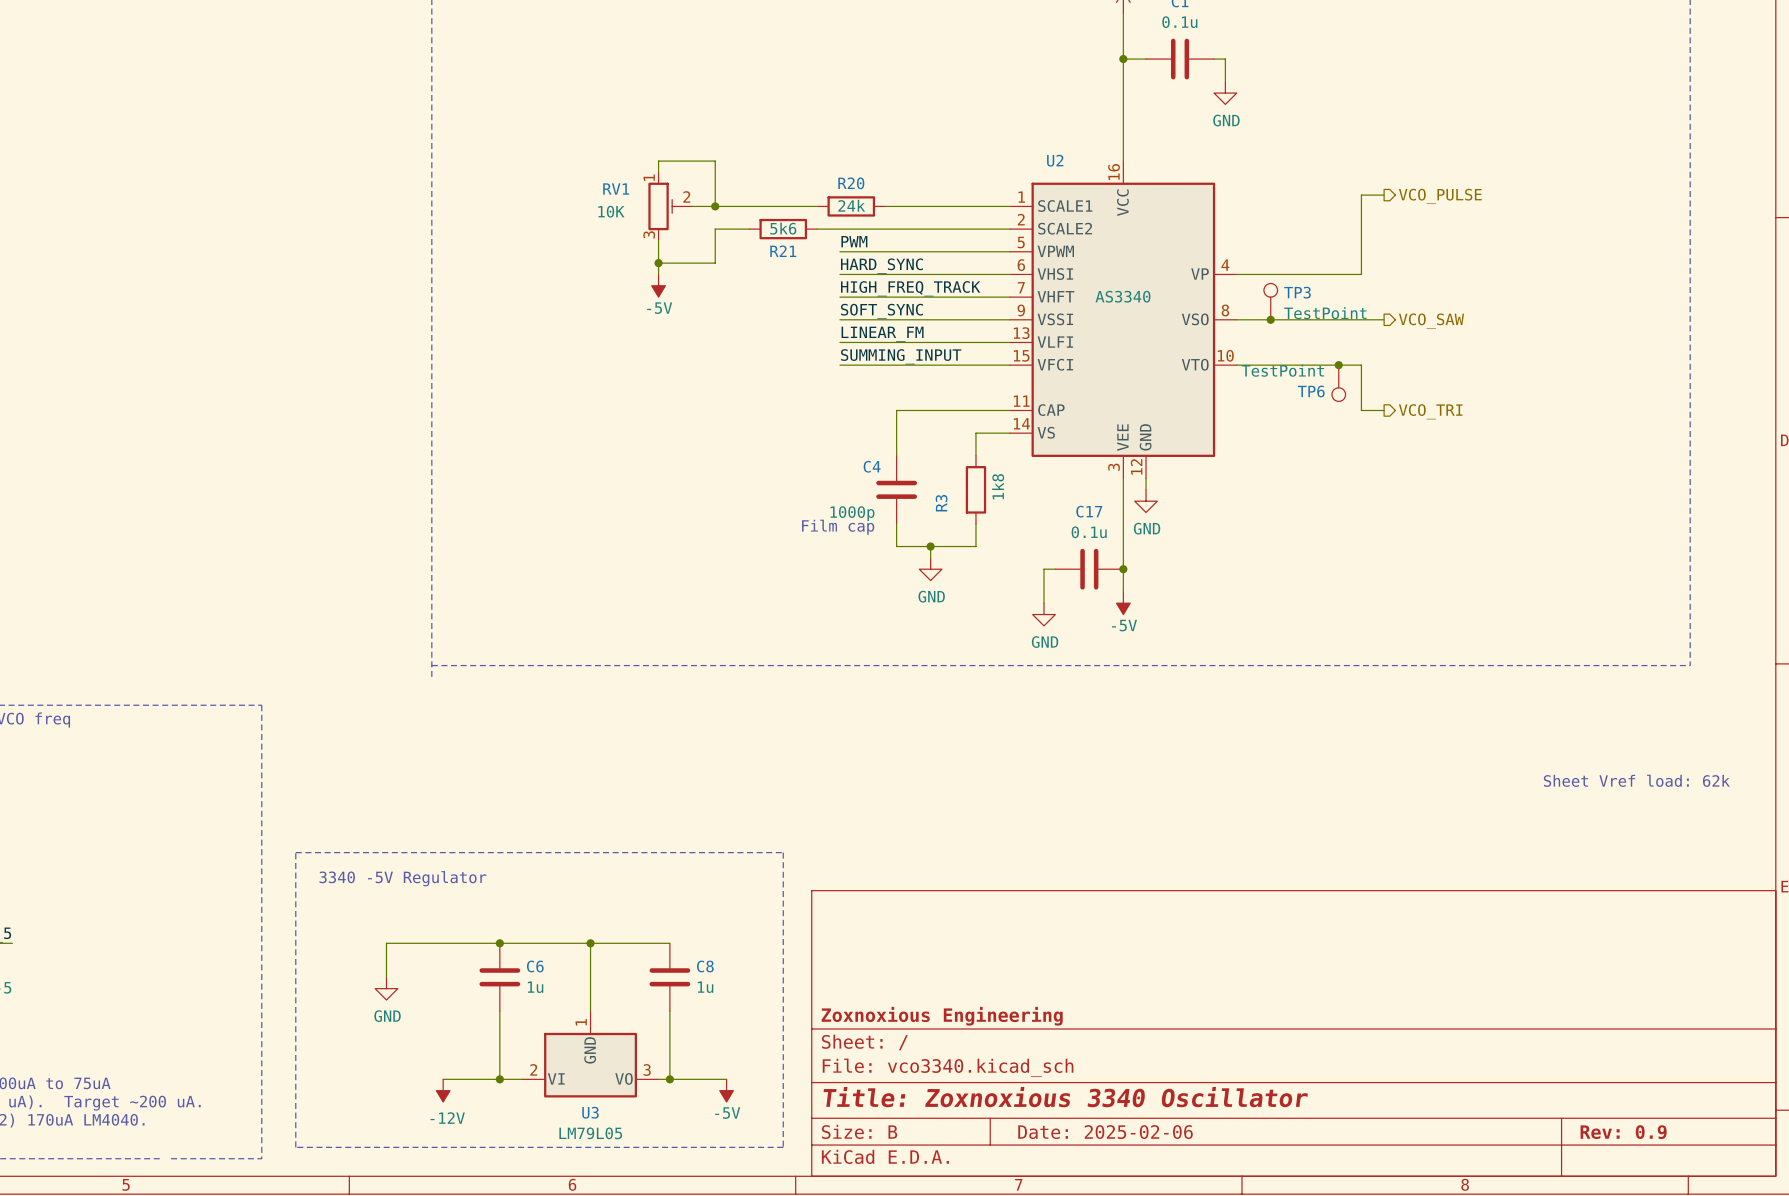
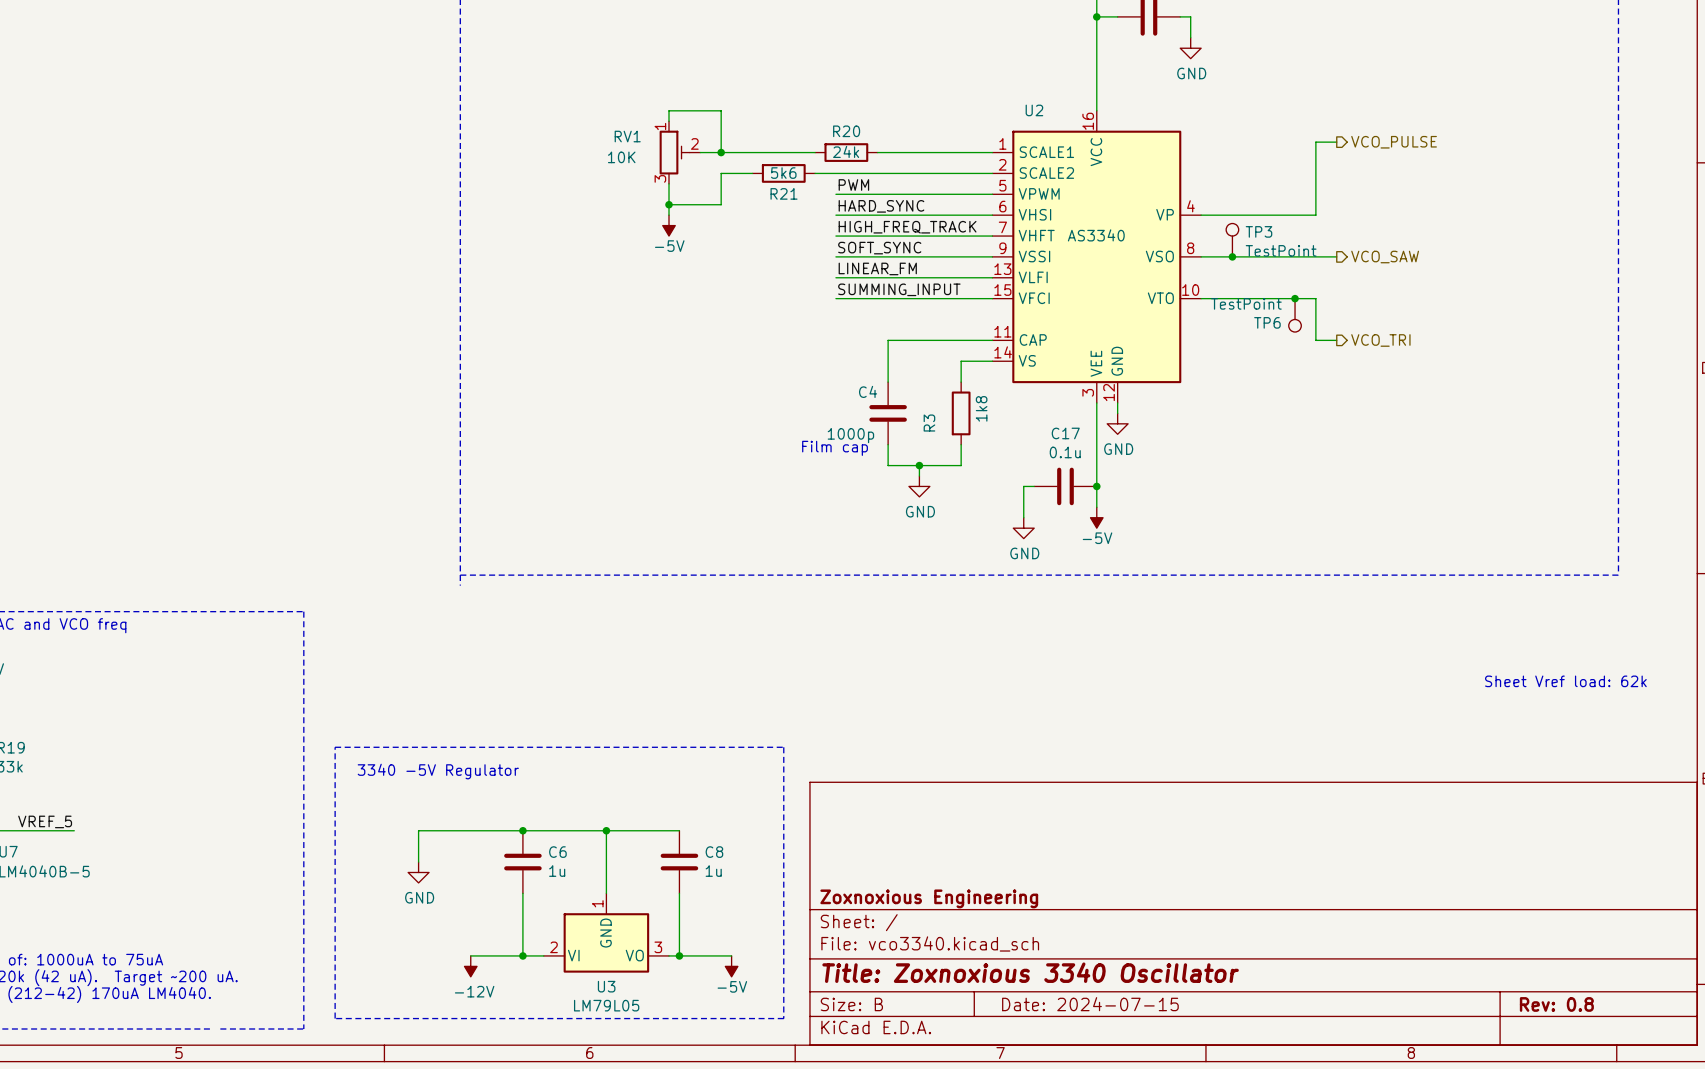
title block: Date: 2025-02-06 (1105, 1132) -> Date: 2024-07-15 (1090, 1004)
title block: Rev: 0.9 (1623, 1132) -> Rev: 0.8 (1556, 1004)

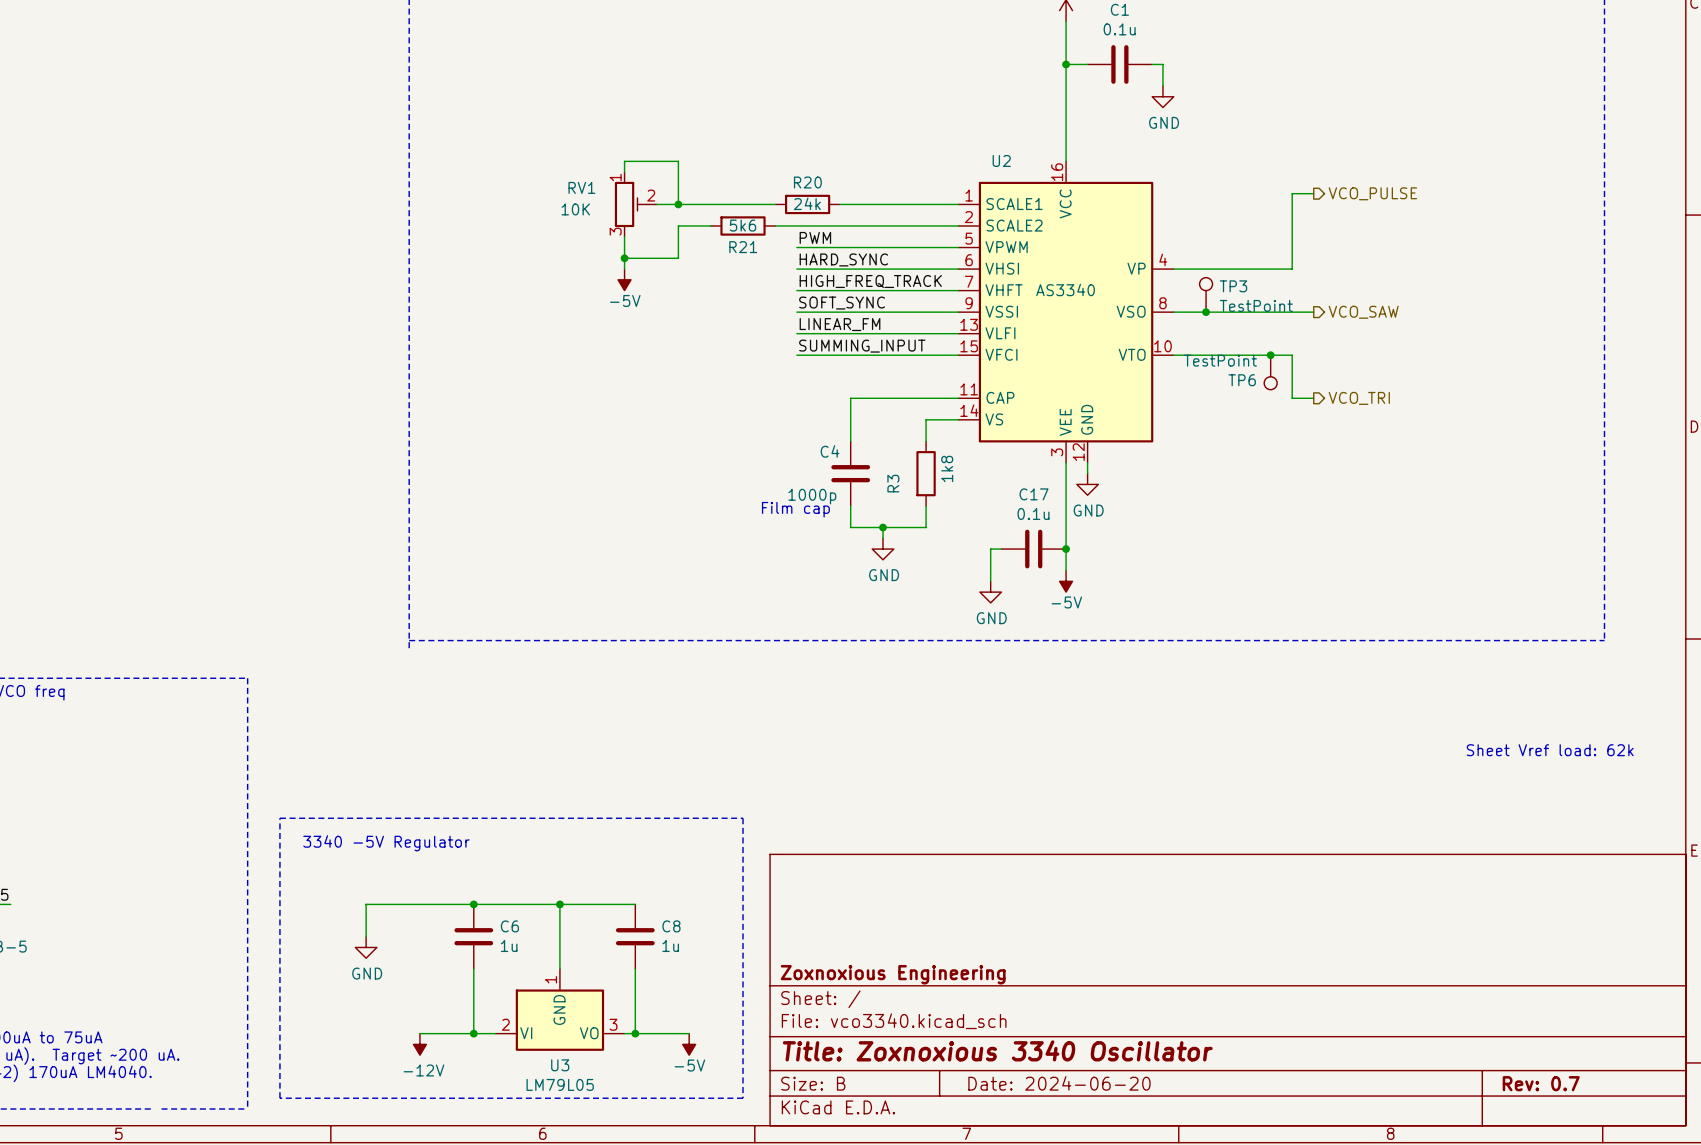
title block: Date: 2024-07-15 (1090, 1004) -> Date: 2024-06-20 (1059, 1083)
title block: Rev: 0.8 (1556, 1004) -> Rev: 0.7 (1541, 1083)

